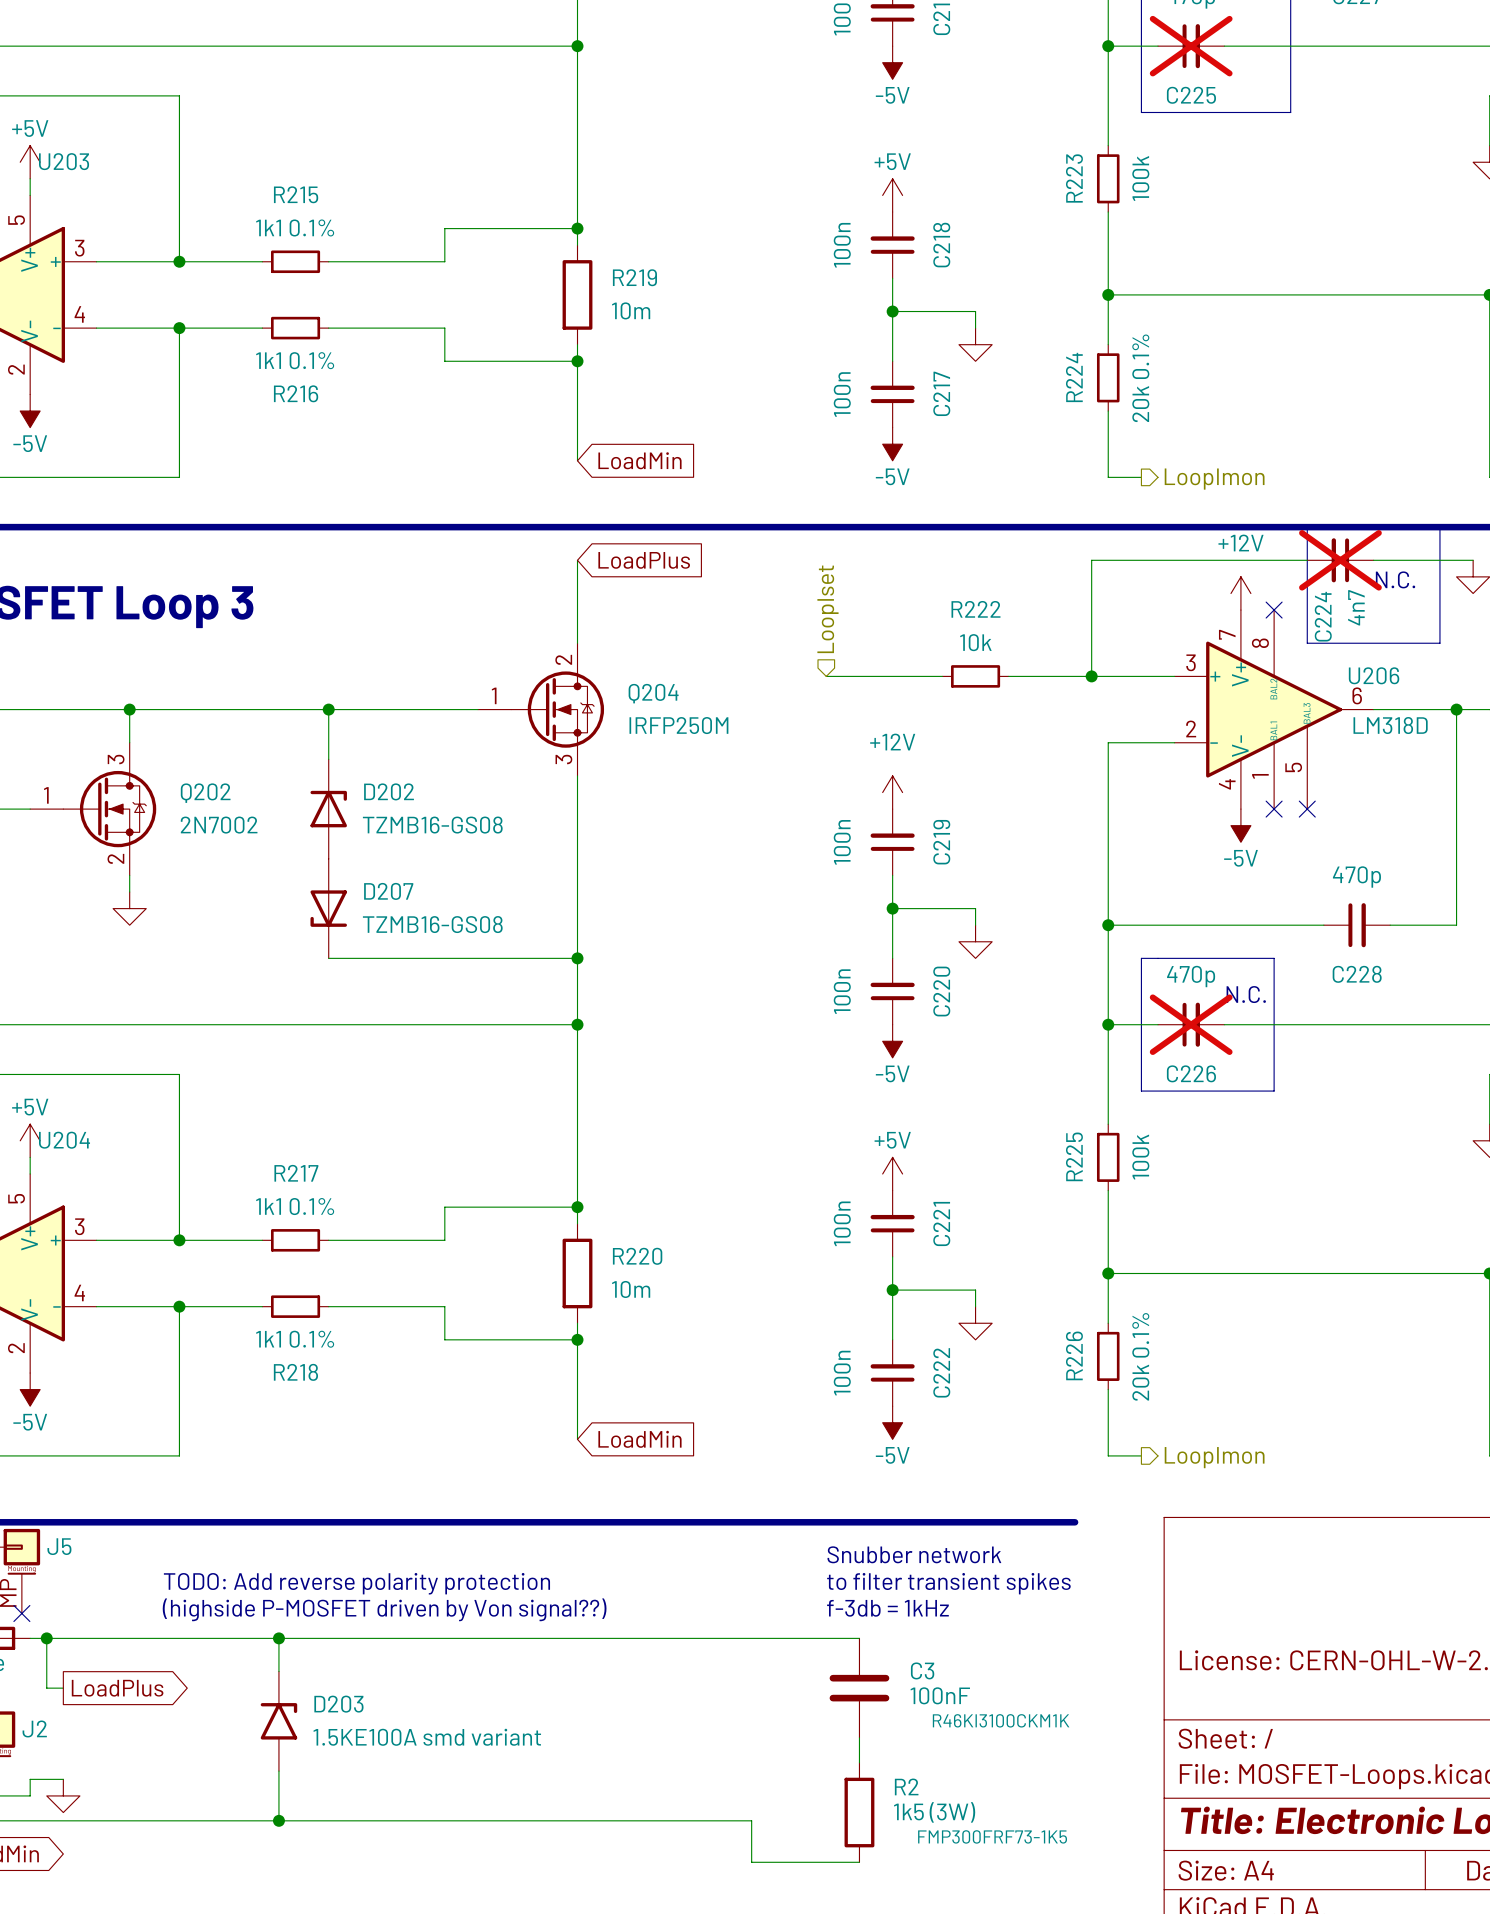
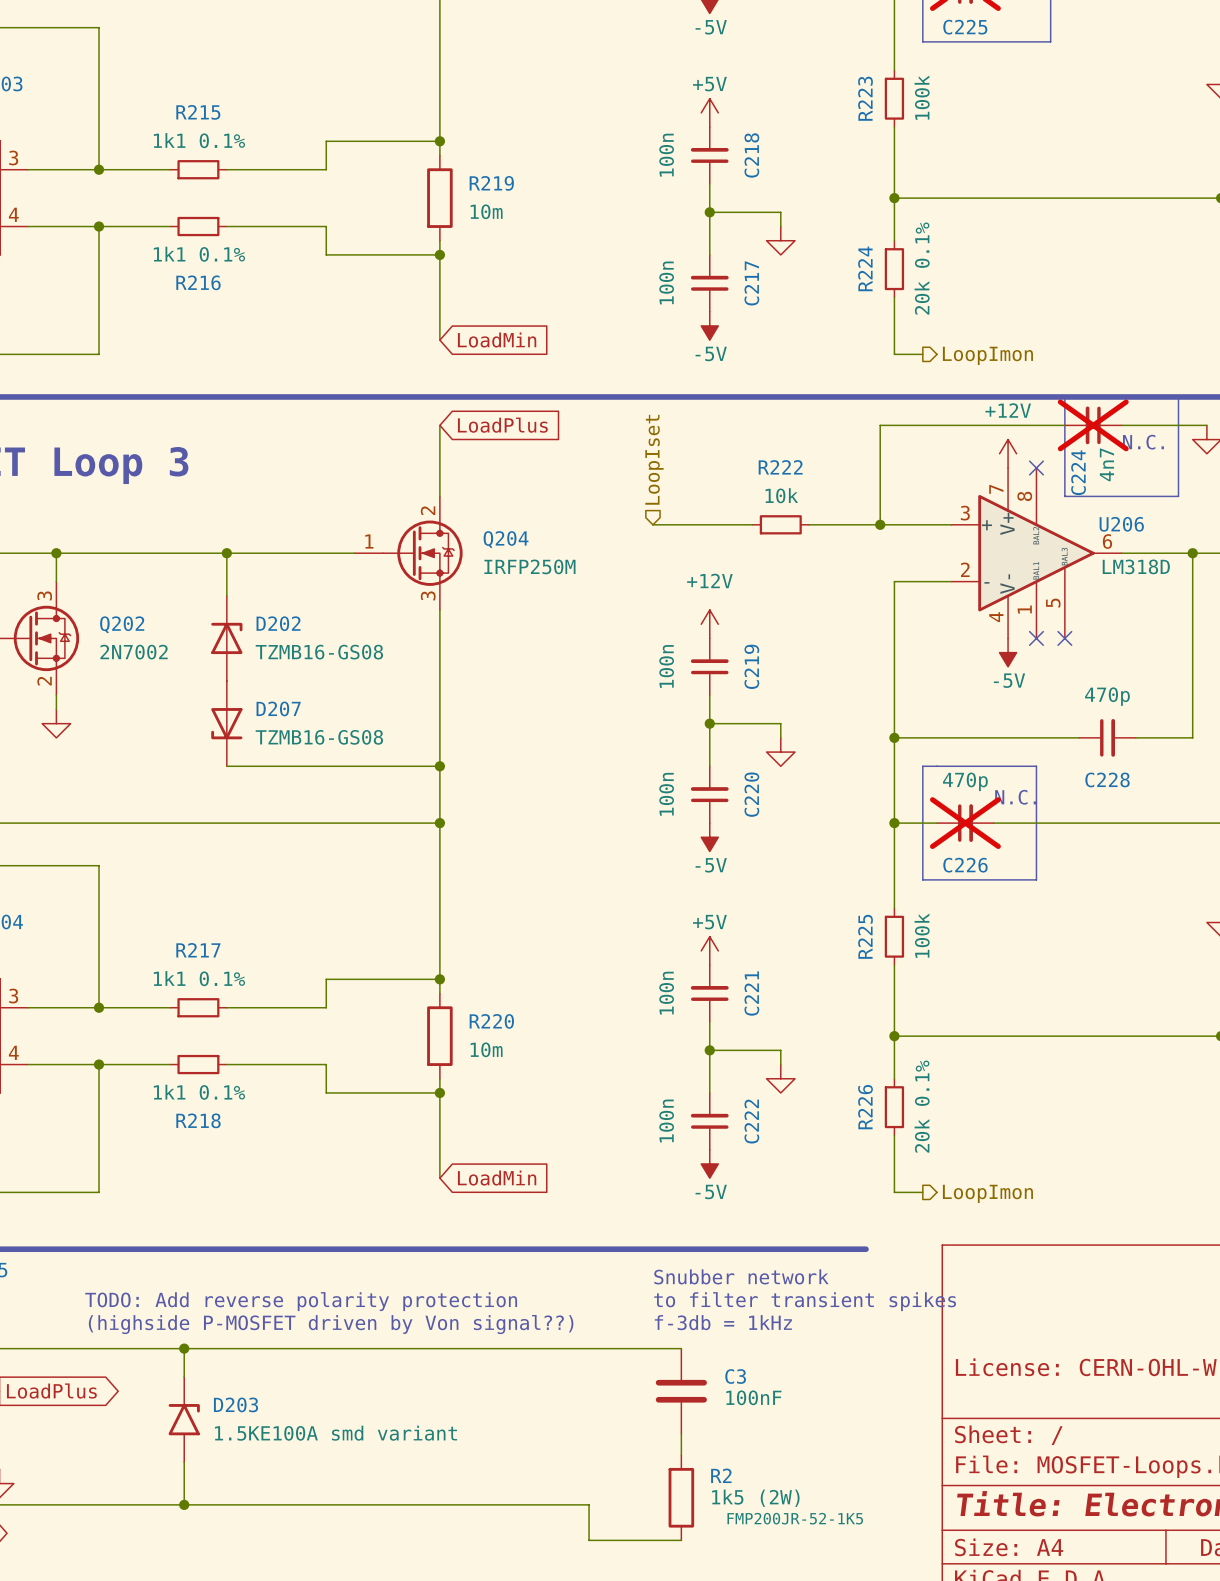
C3 text: R46KI3100CKM1K (1001, 1720) -> none
R2 value: 1k5 (3W) (934, 1812) -> 1k5 (2W) (755, 1498)
R2 text: FMP300FRF73-1K5 (992, 1836) -> FMP200JR-52-1K5 (795, 1518)

